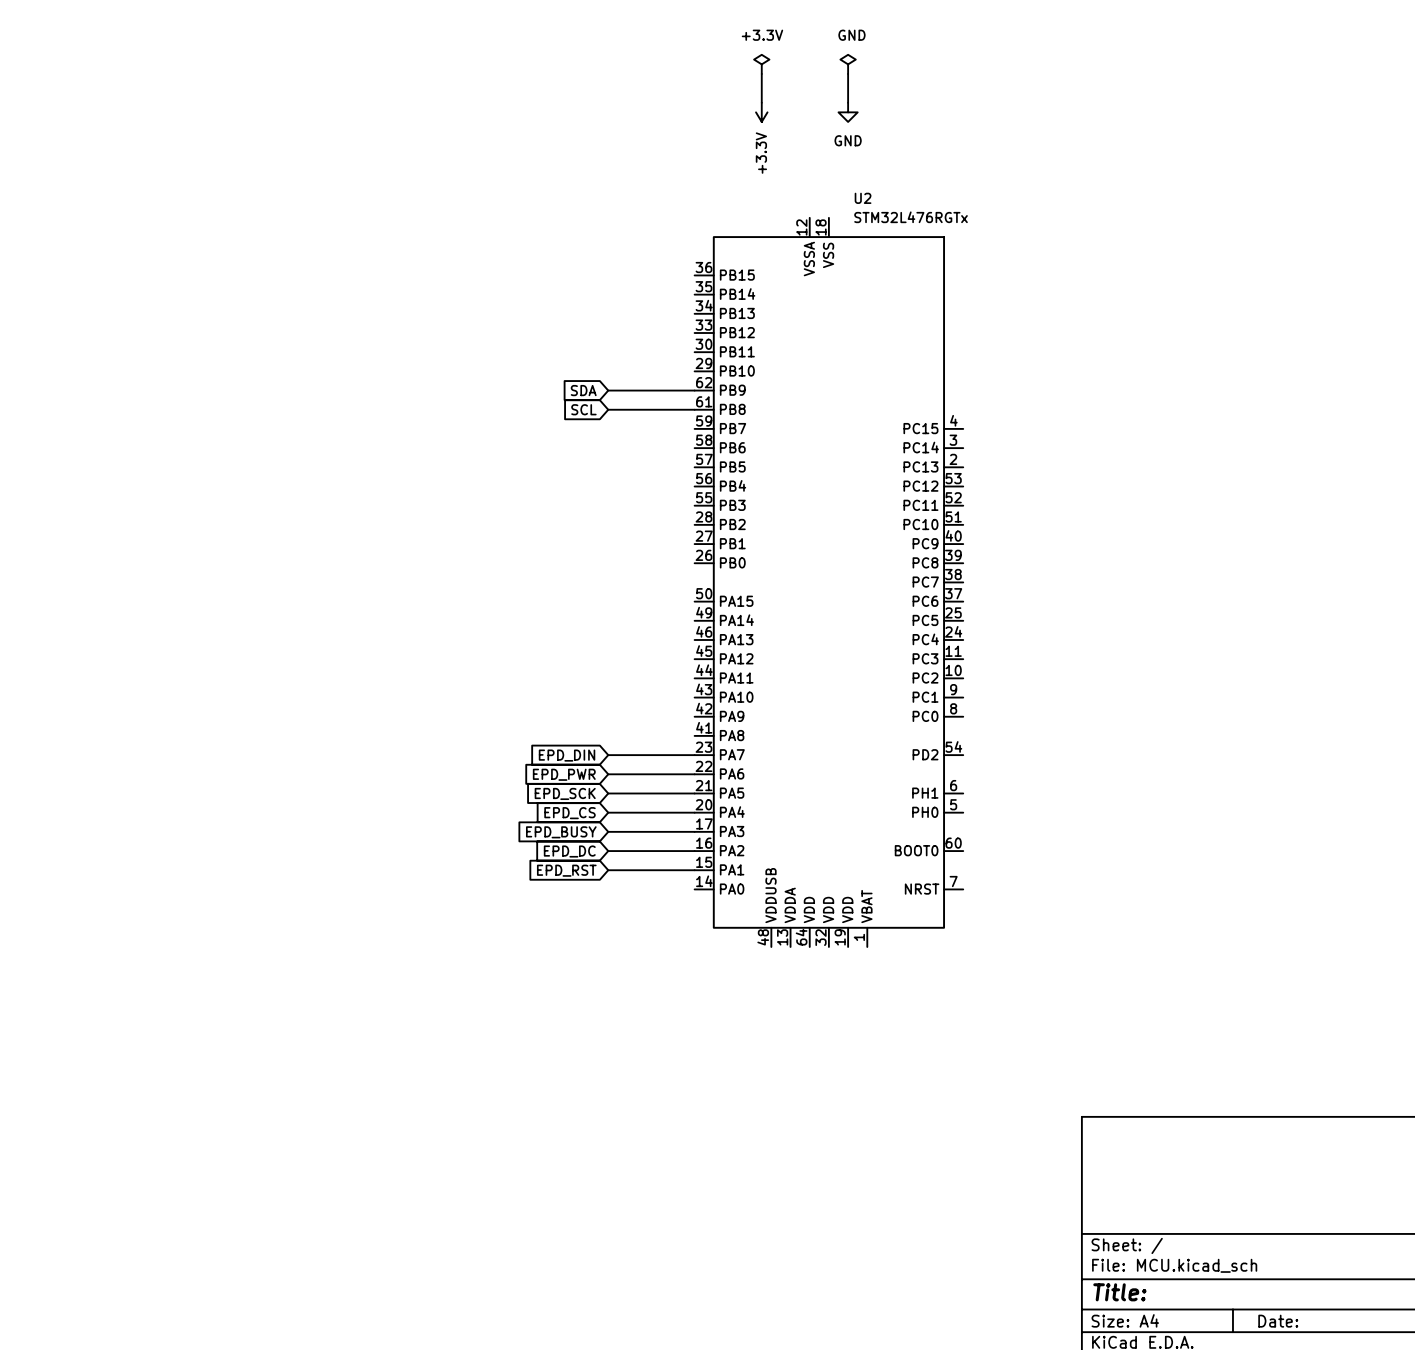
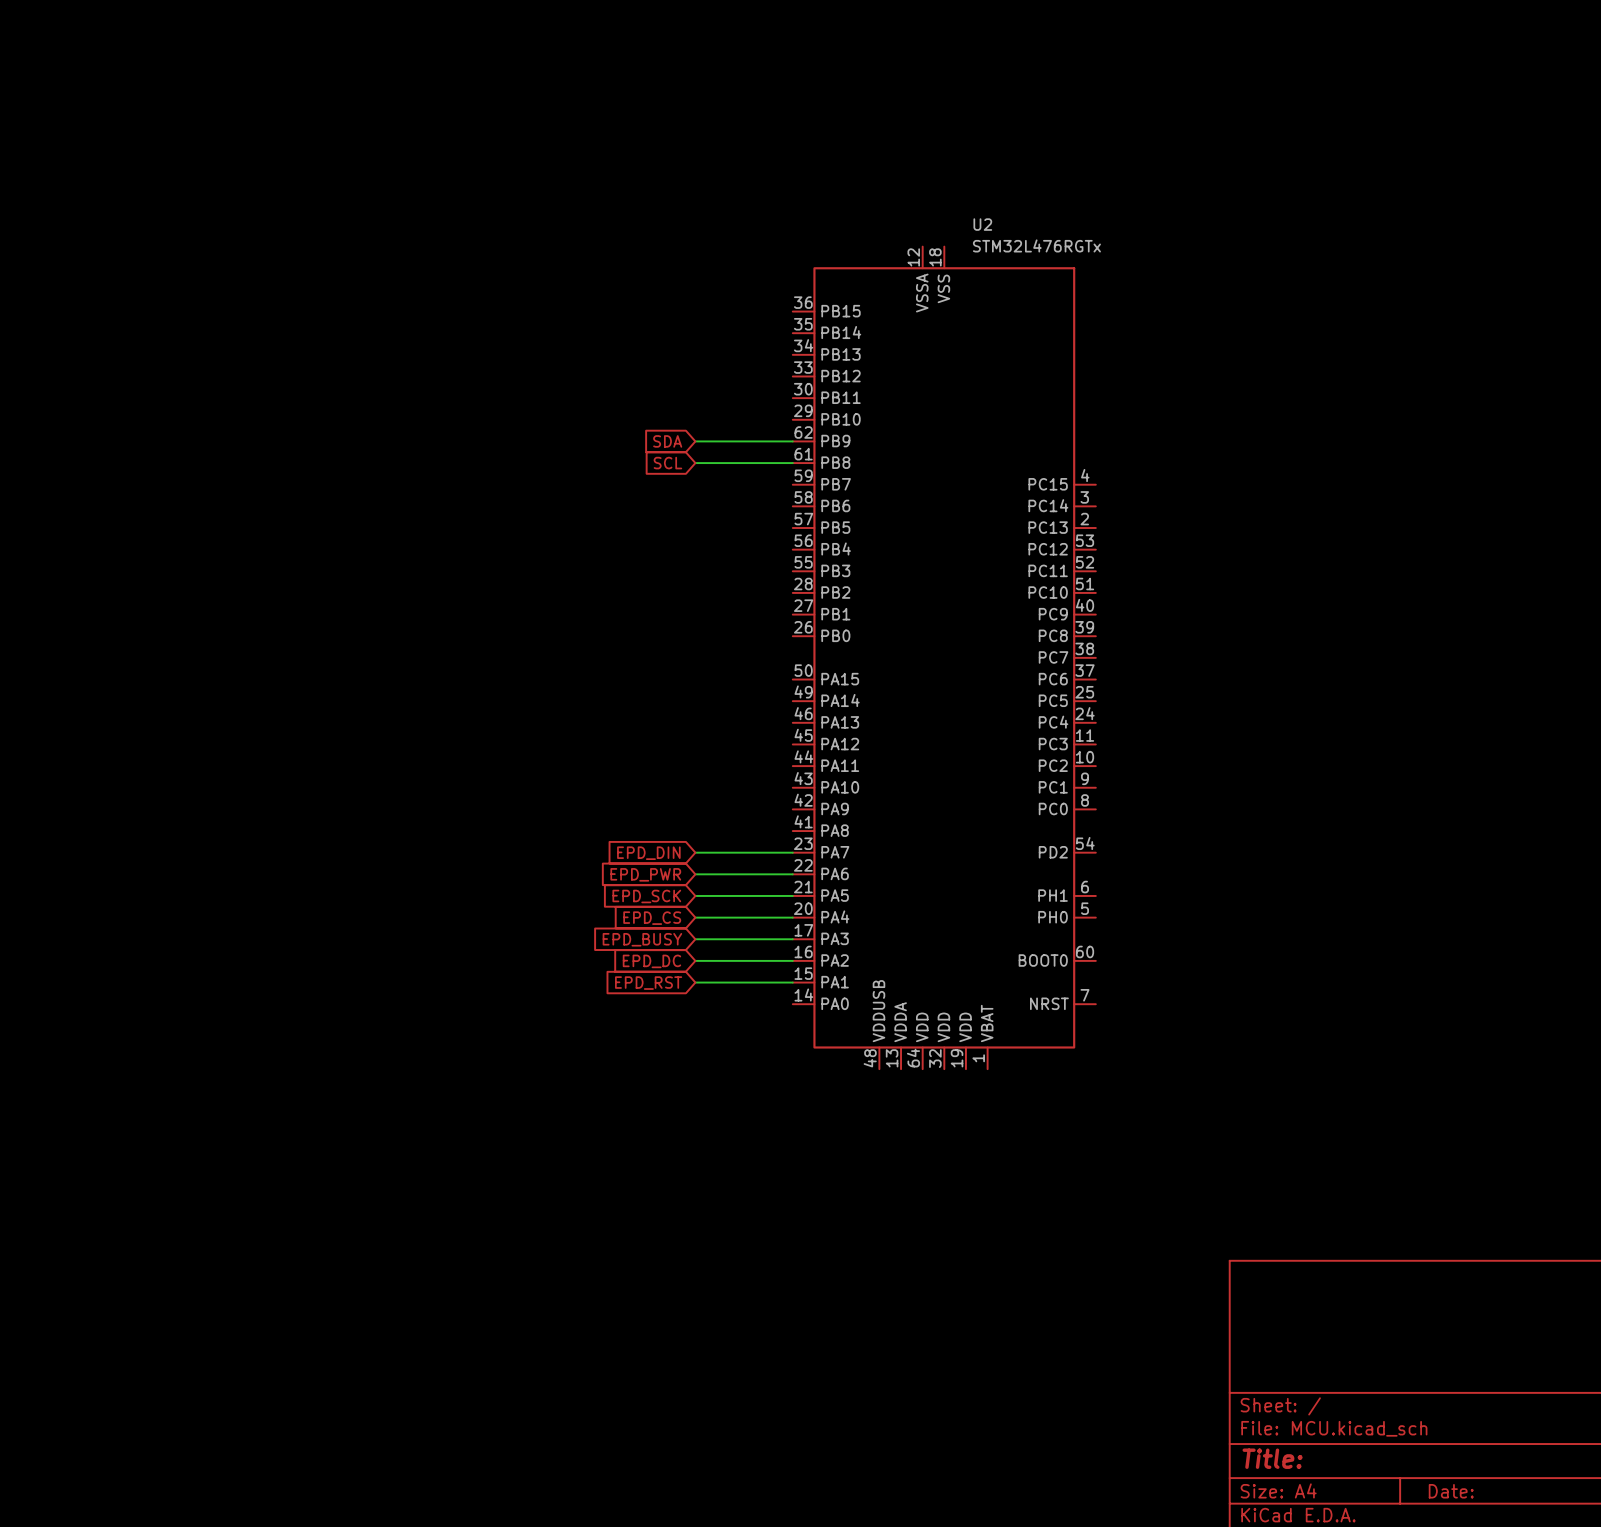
power symbol: +3.3V (761, 64) -> none
power symbol: GND (848, 64) -> none
wire: (761, 73) (761, 102) -> none
wire: (848, 73) (848, 102) -> none
power symbol: +3.3V (761, 112) -> none
power symbol: GND (848, 112) -> none

